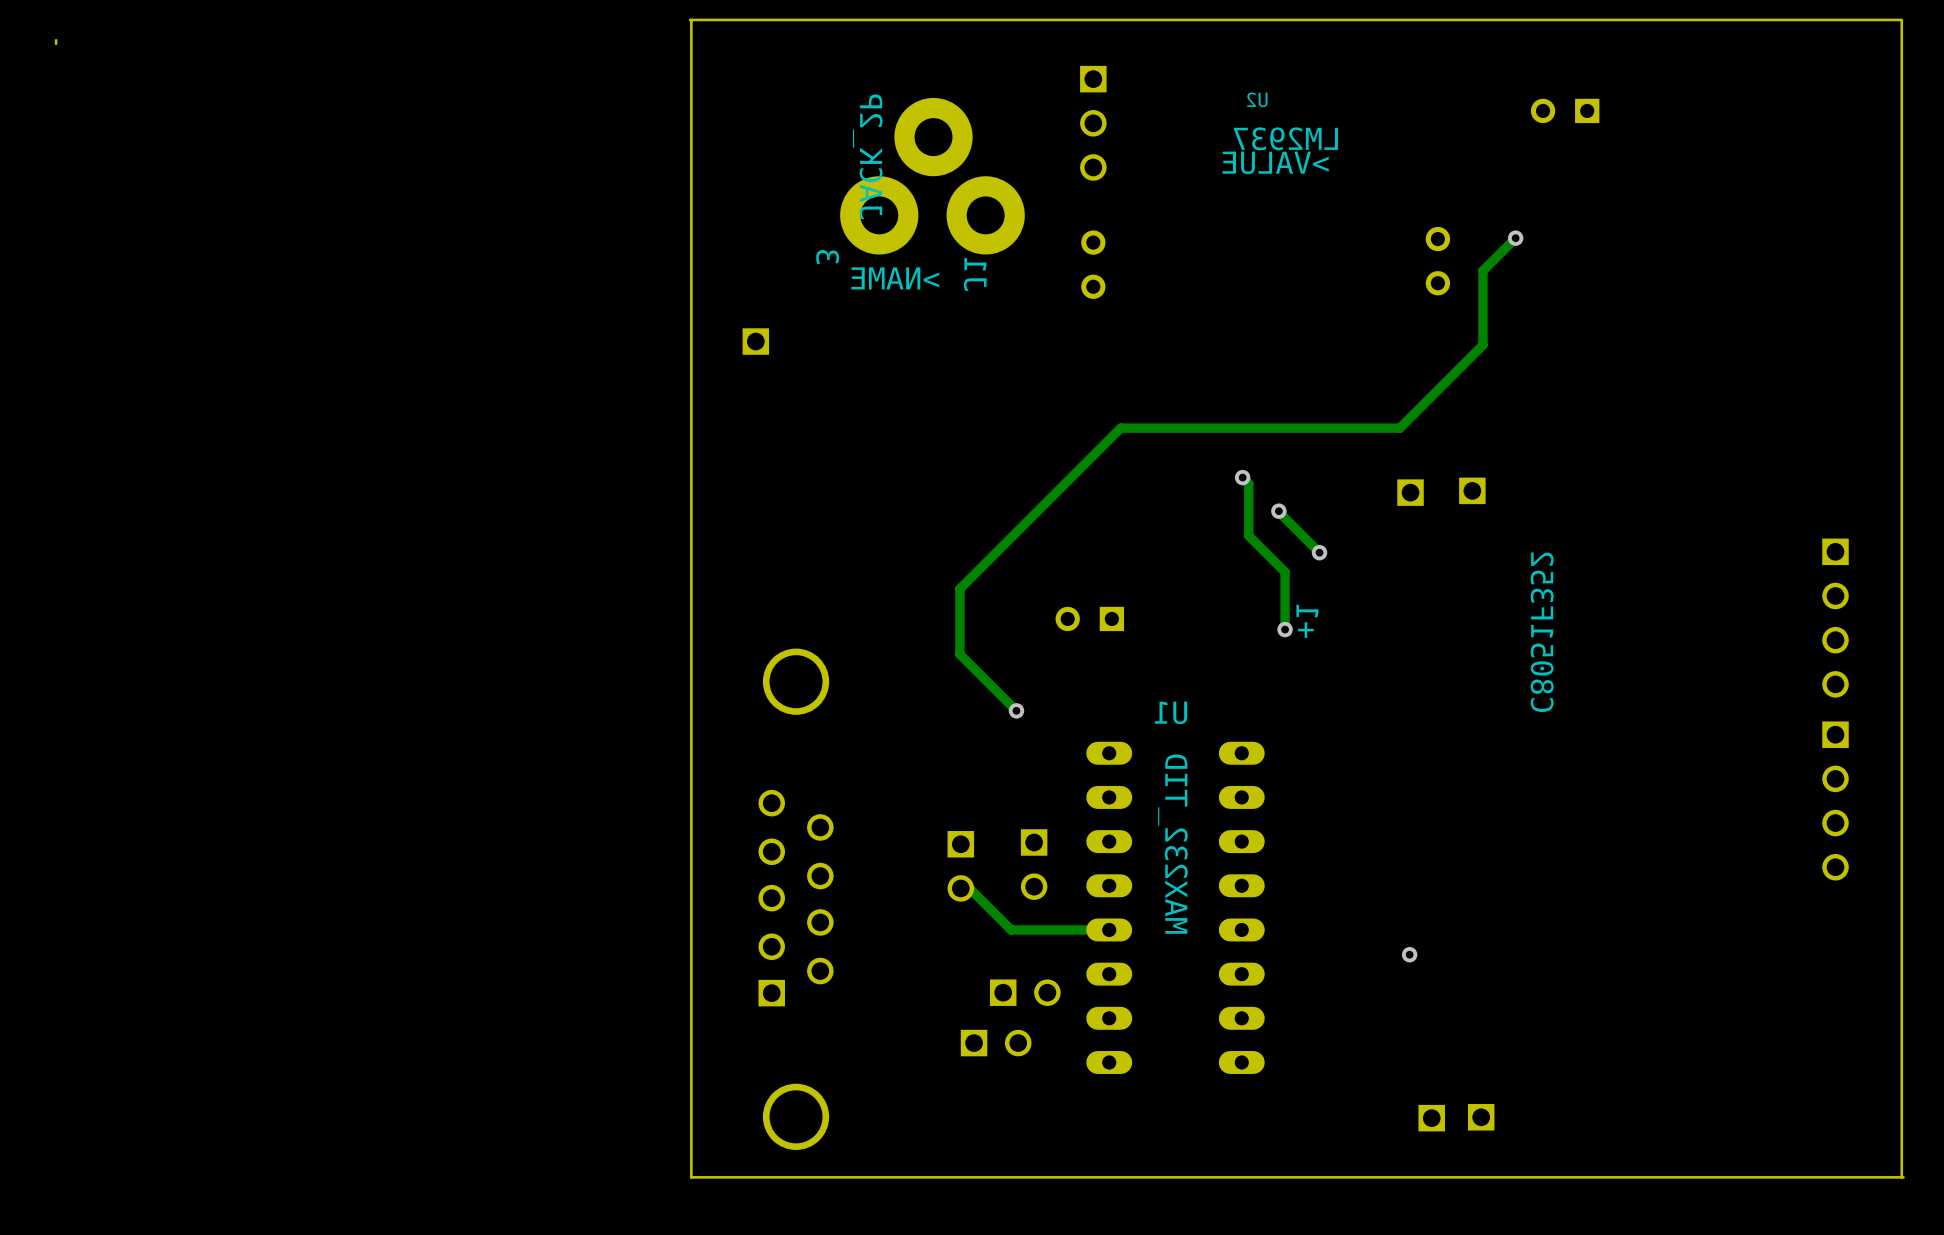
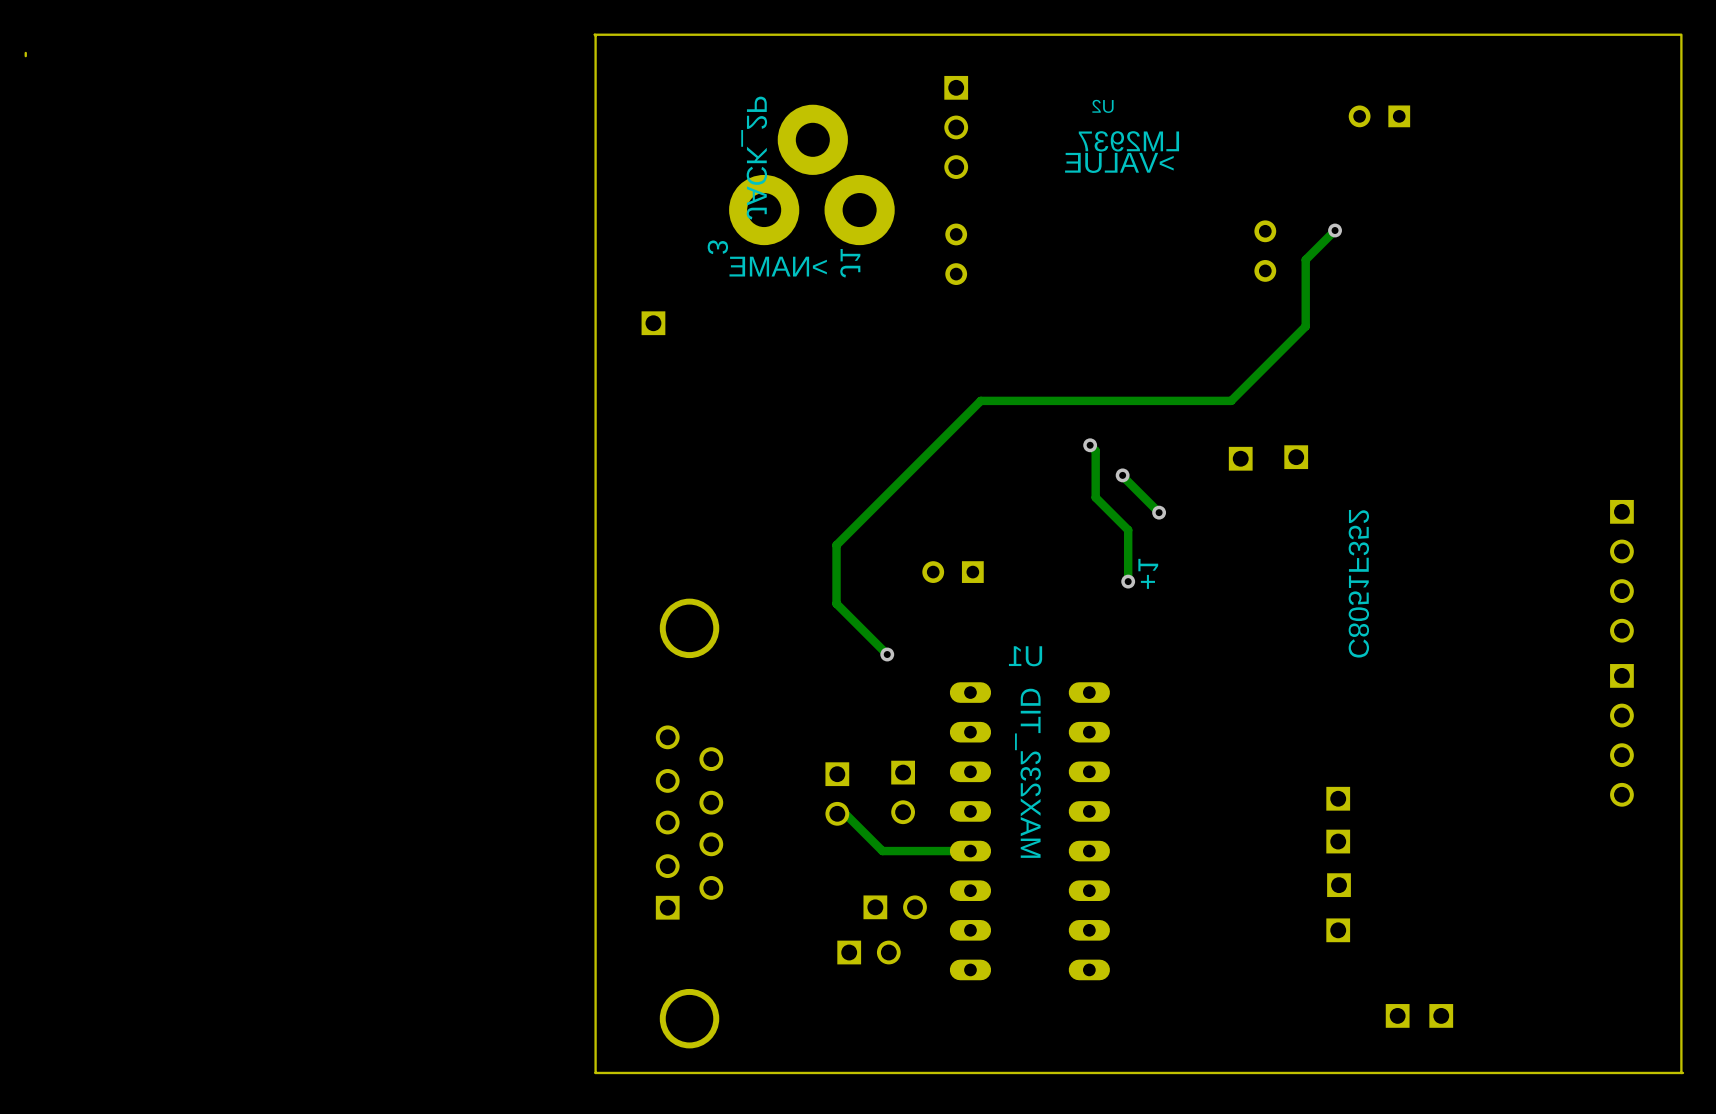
part: none -> (1338, 798)
part: none -> (1338, 841)
via: (1409, 954) -> none
part: none -> (1339, 885)
part: none -> (1338, 930)
part: none -> (1397, 1015)
part: none -> (1441, 1015)
part: (1481, 1117) -> none
part: (1431, 1118) -> none

